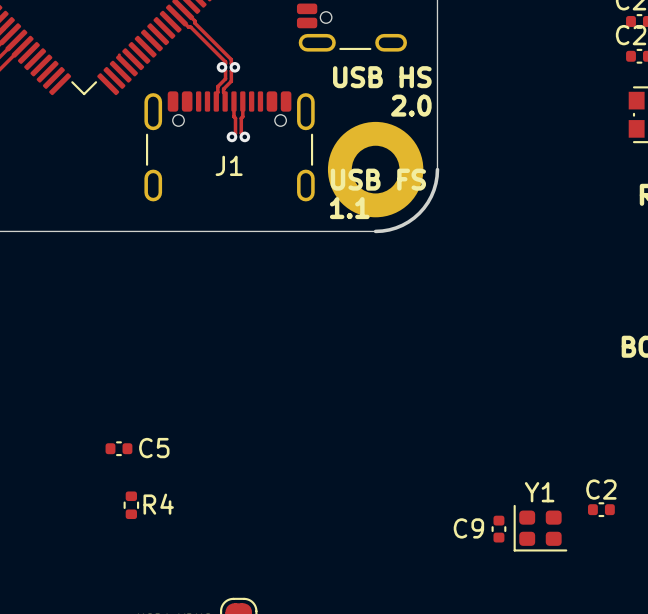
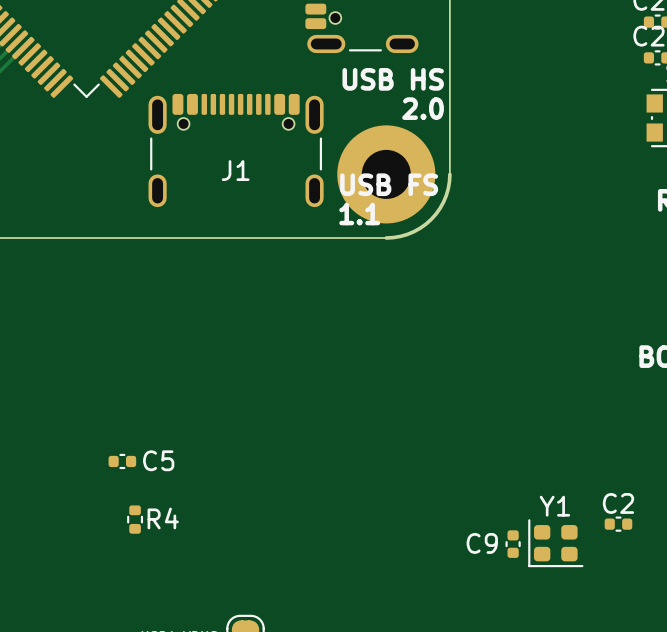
track: (183, 9) (231, 59) (231, 63) (234, 67) (231, 70) (231, 81) (223, 89) (225, 101) -> none
track: (176, 15) (225, 61) (222, 67) (225, 70) (225, 78) (217, 86) (216, 101) -> none
via: (222, 67) -> none
via: (234, 67) -> none
track: (233, 101) (235, 133) (231, 136) -> none
track: (242, 101) (241, 133) (244, 136) -> none
via: (231, 136) -> none
via: (244, 136) -> none

